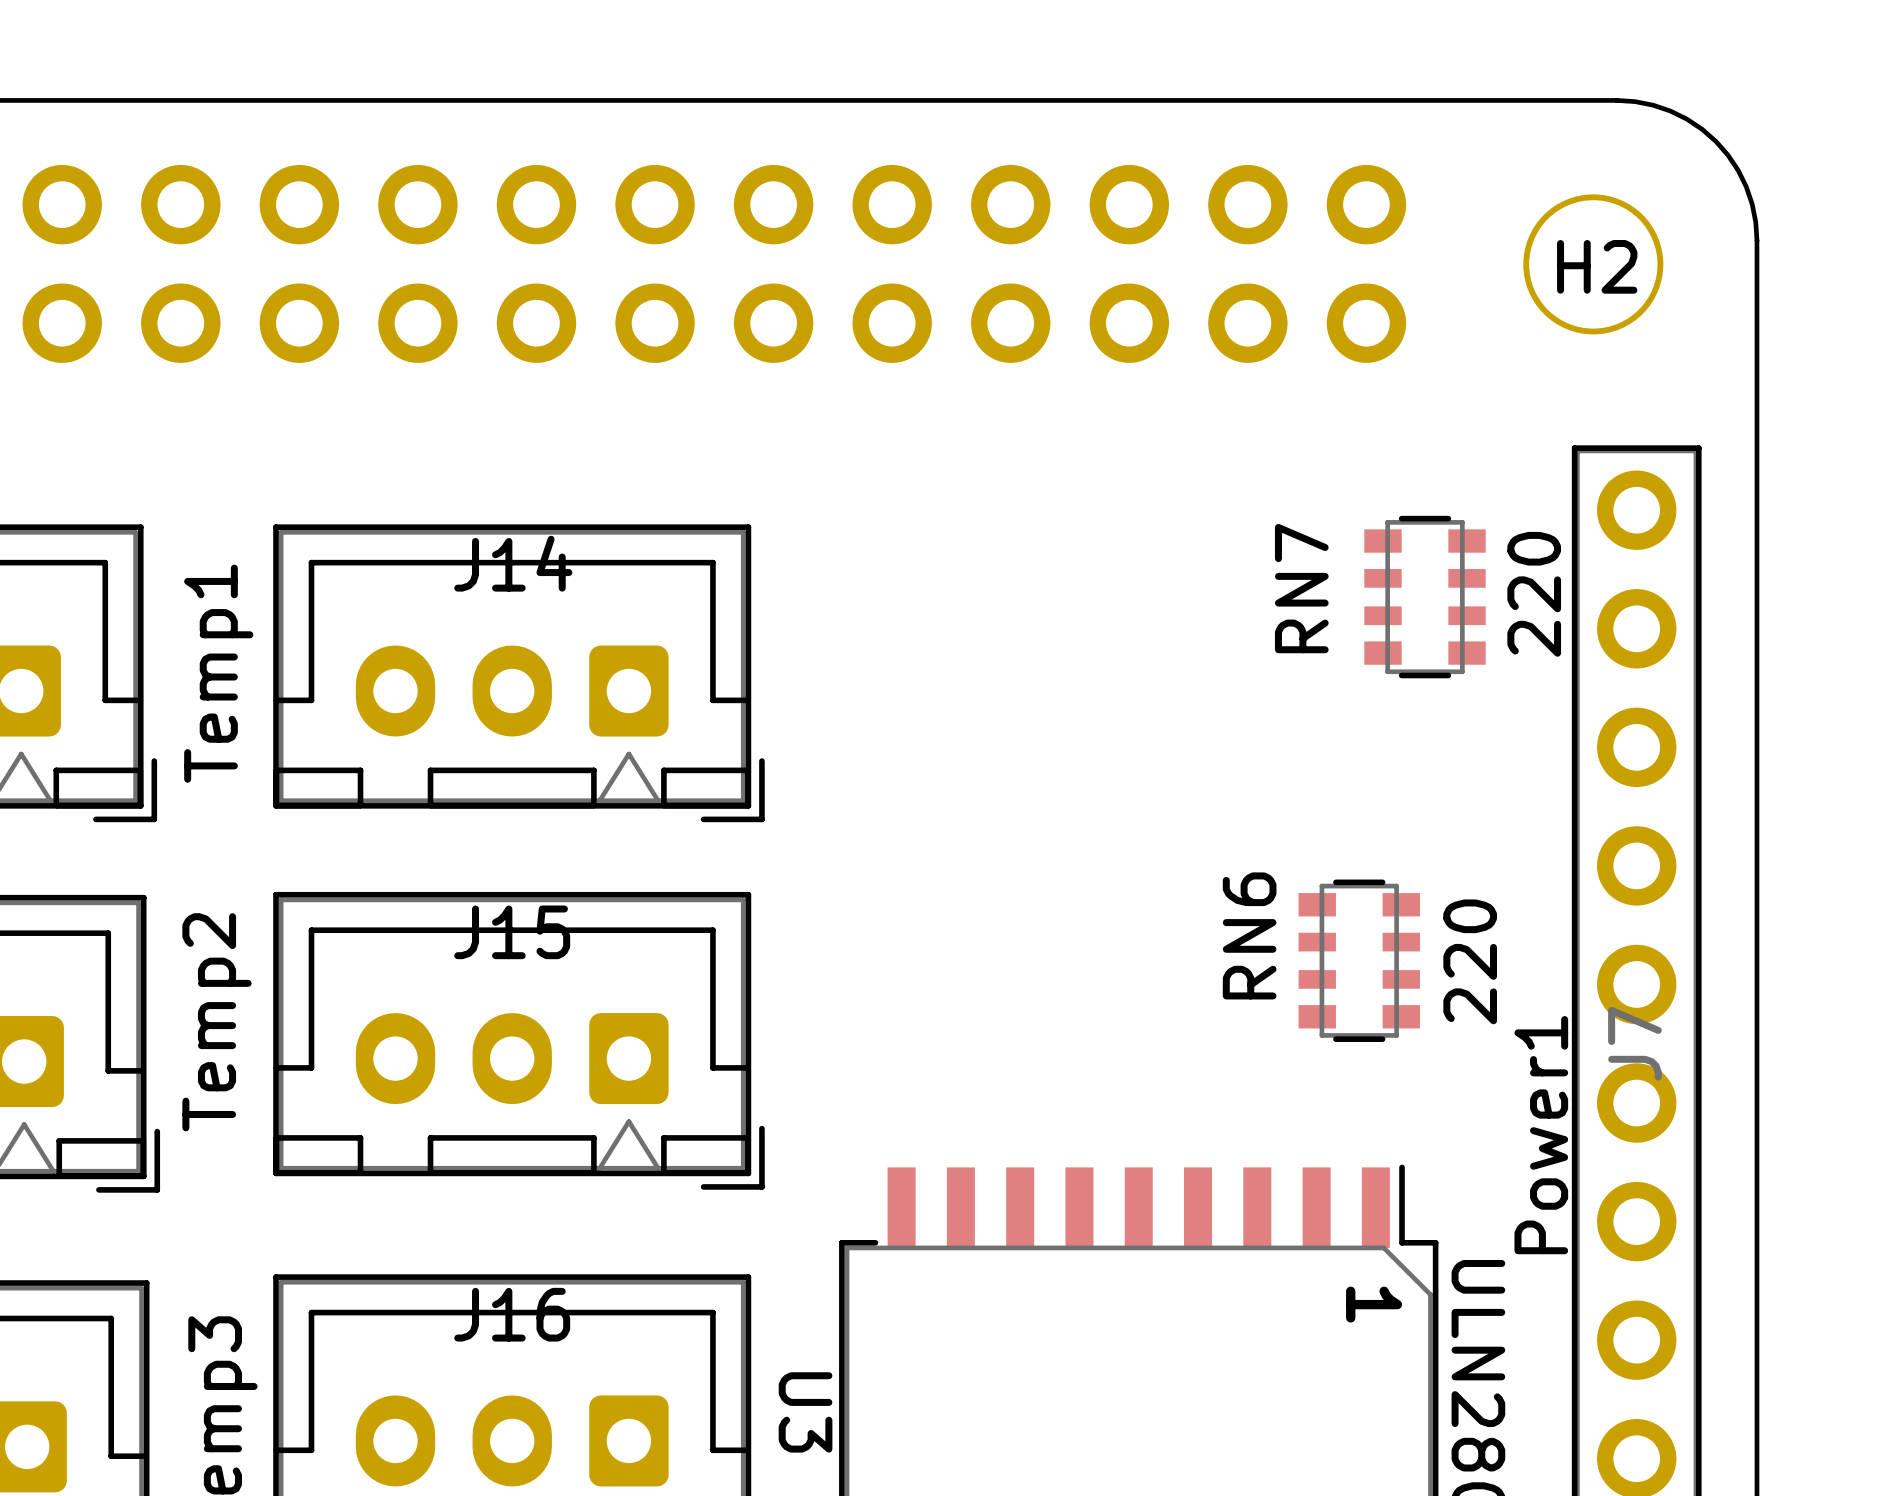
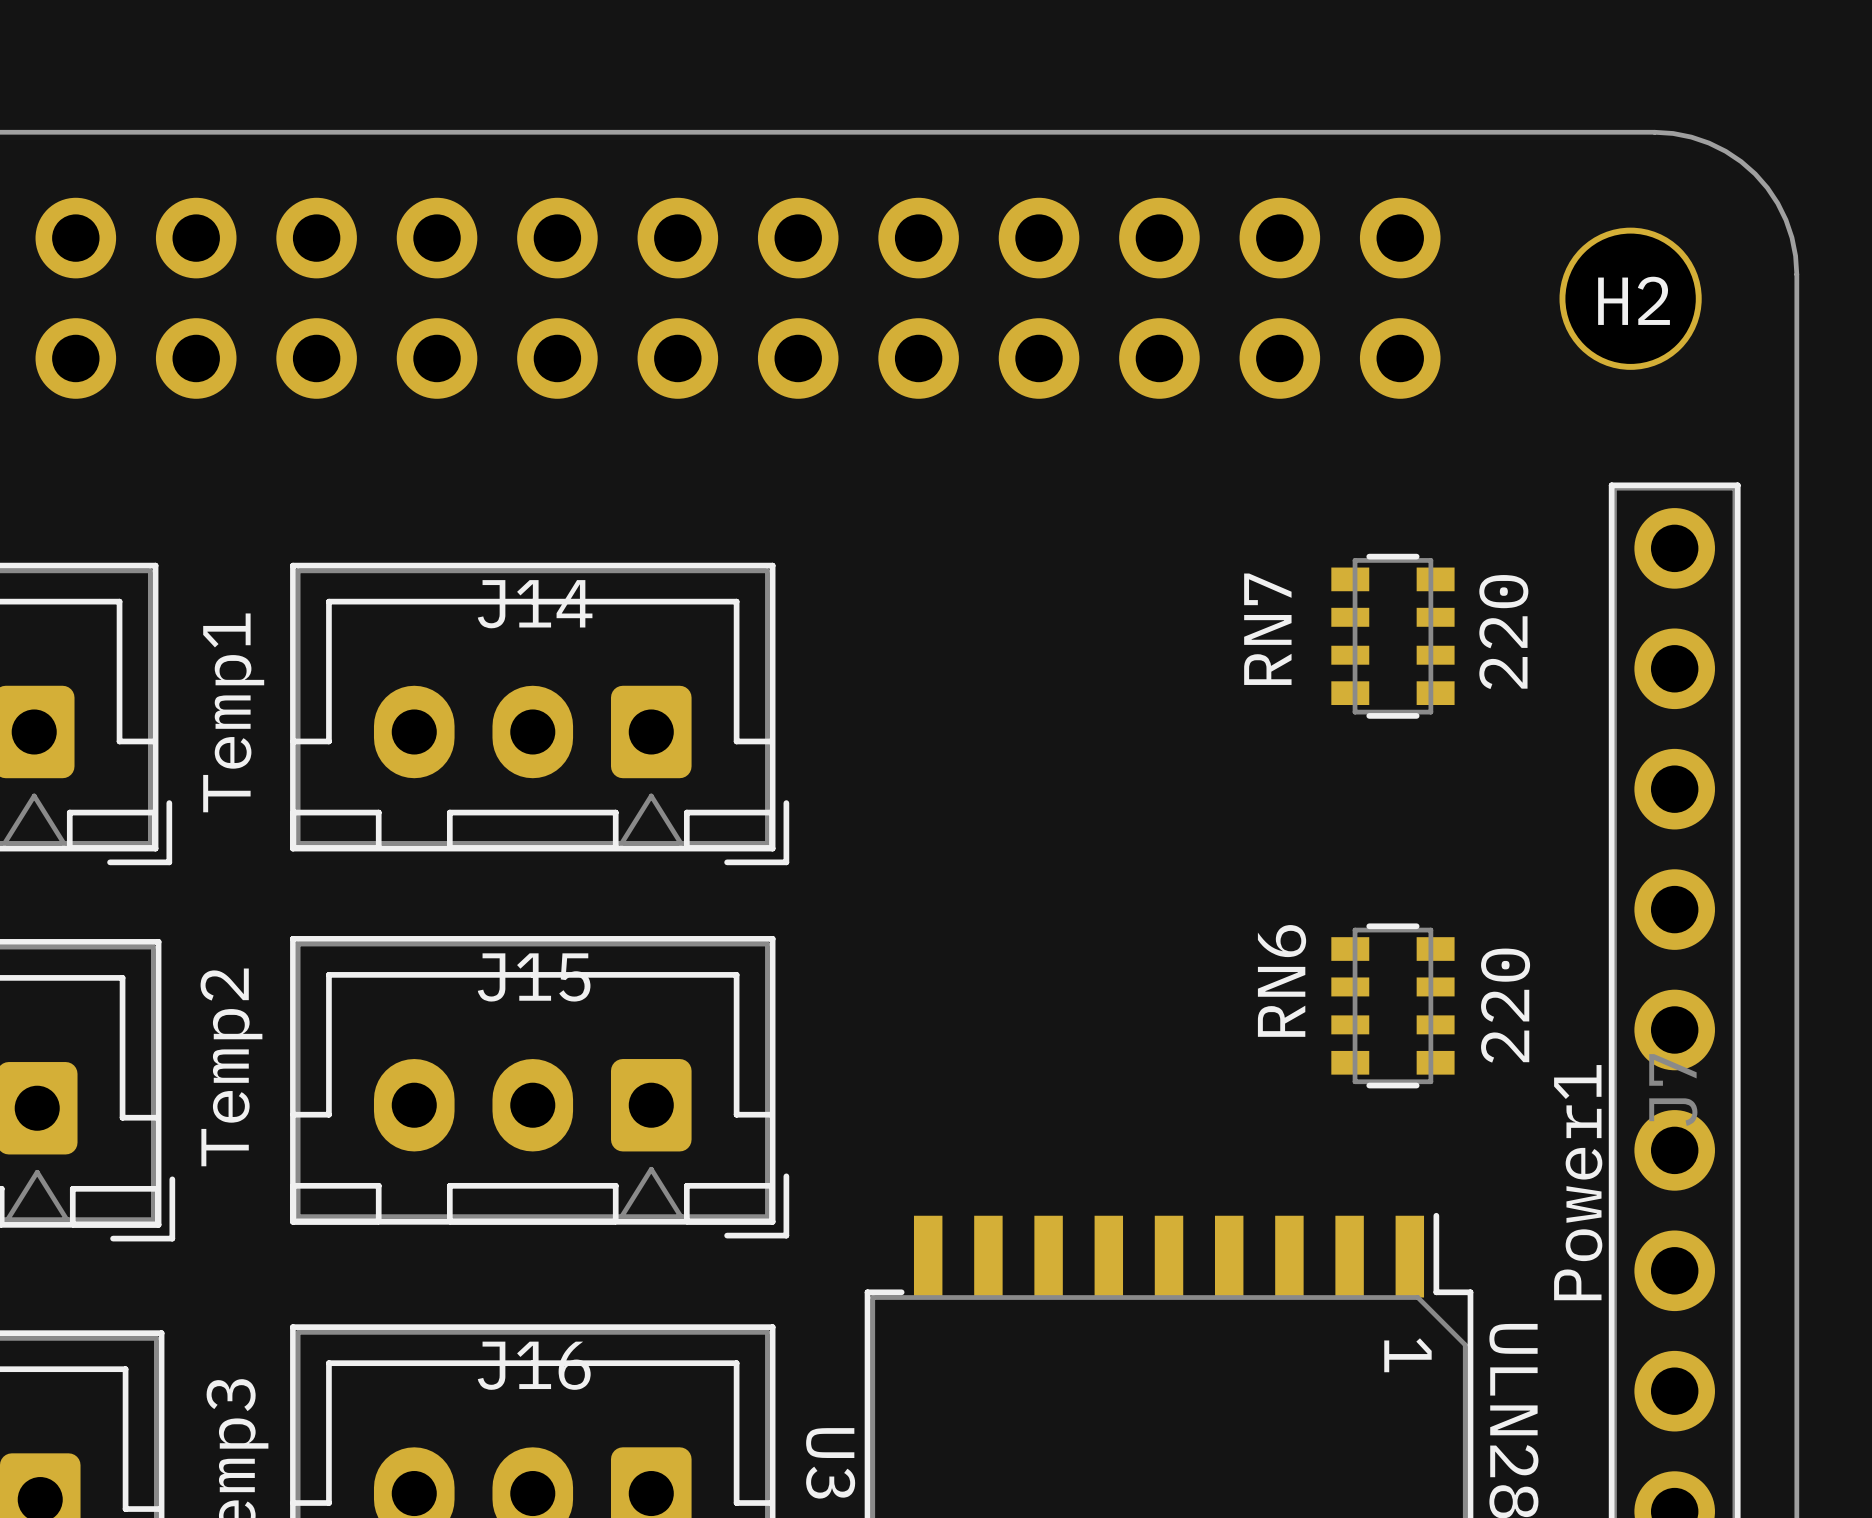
RN7 position: (1425, 597) -> (1392, 636)

